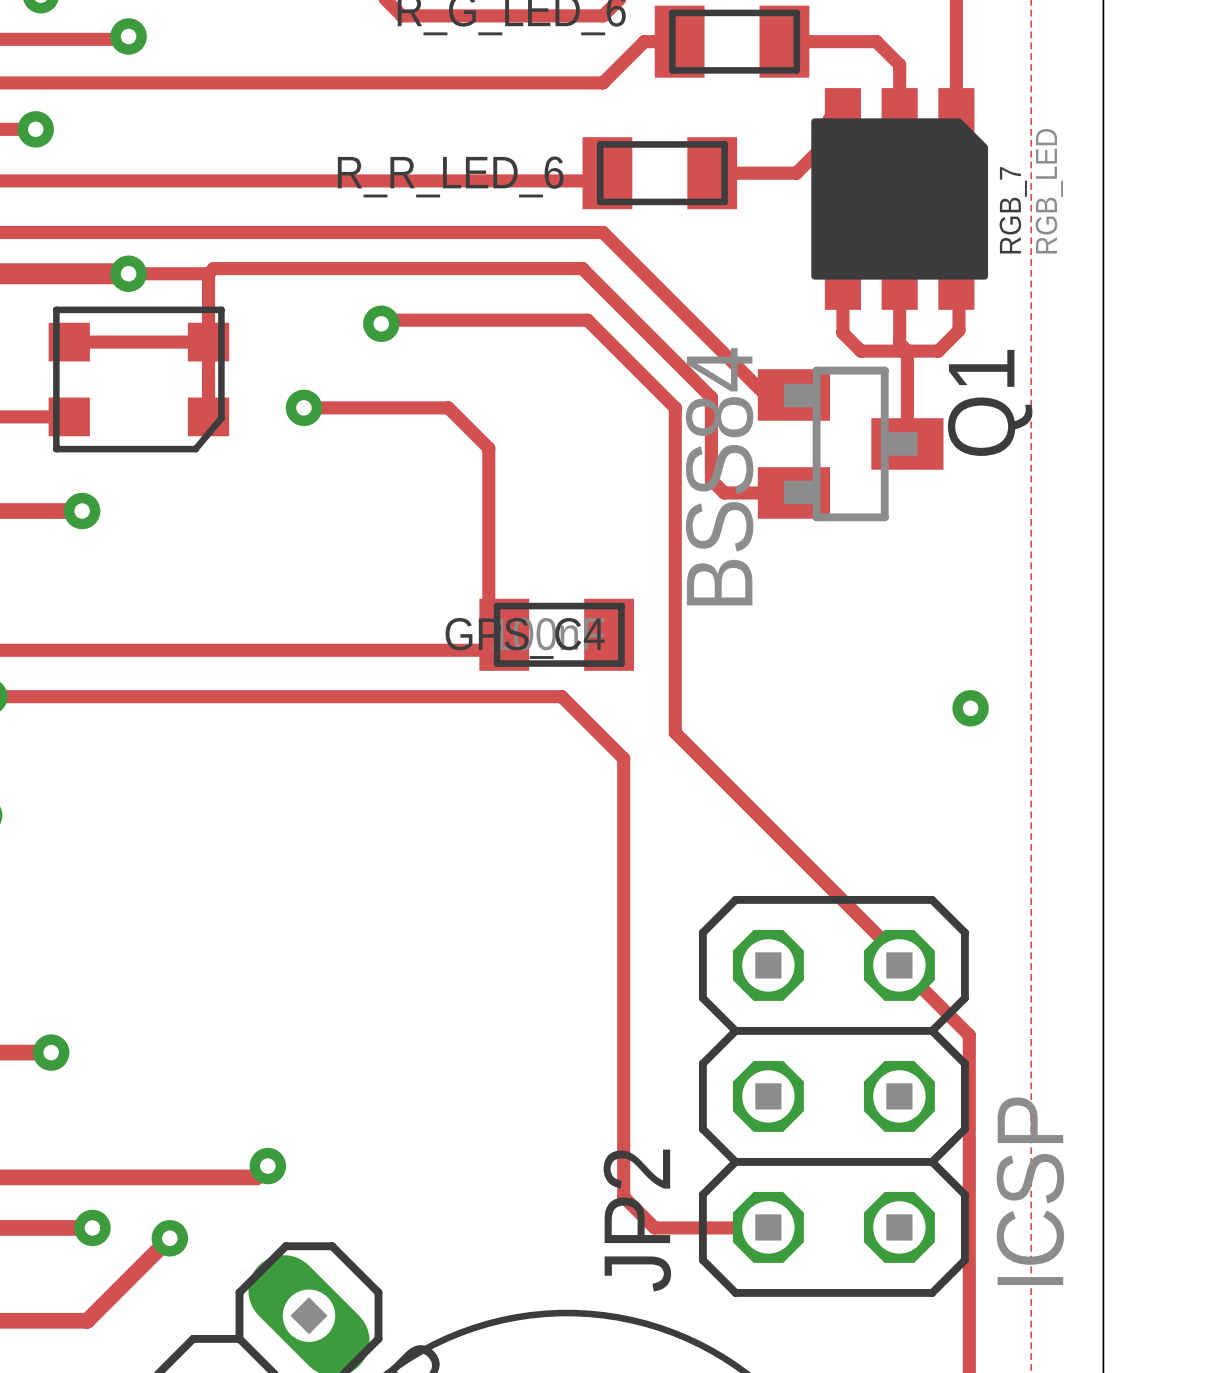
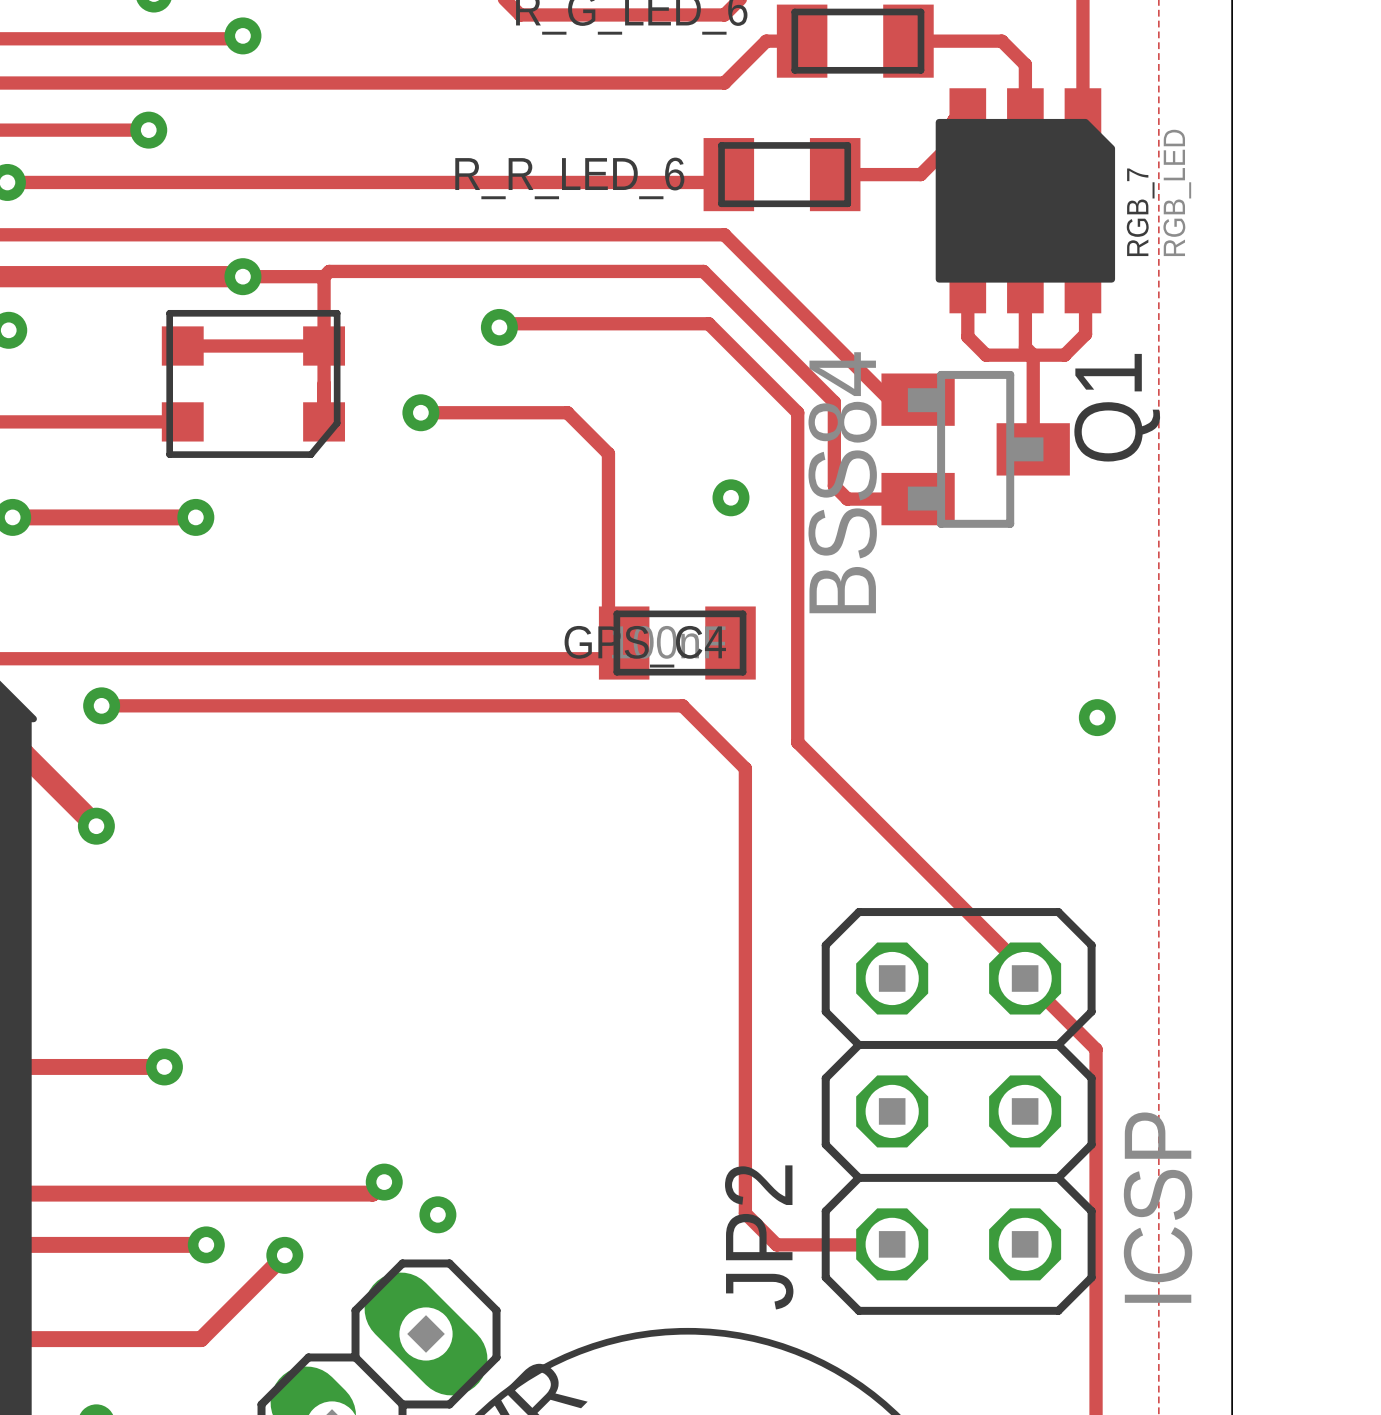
via: none -> (730, 497)
via: none -> (437, 1214)

